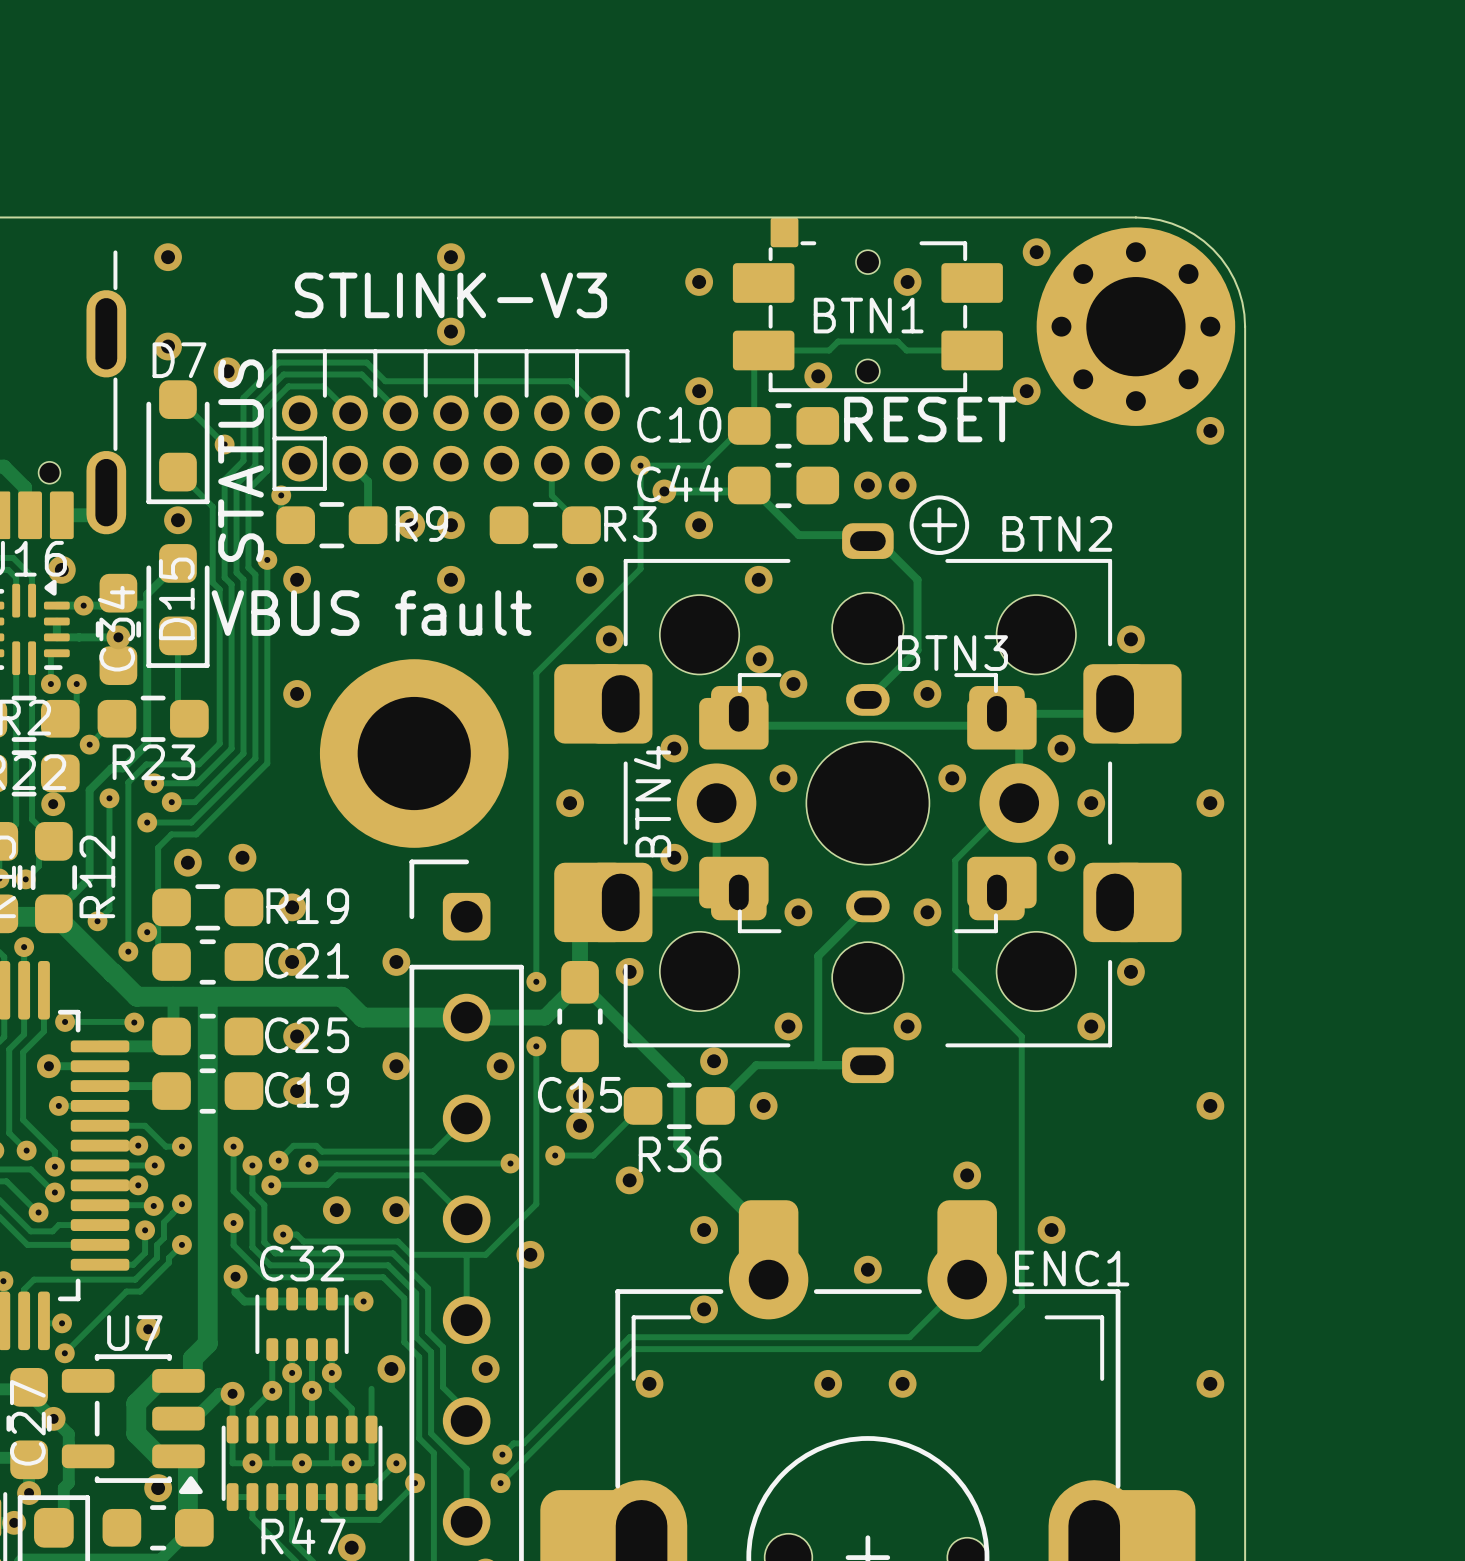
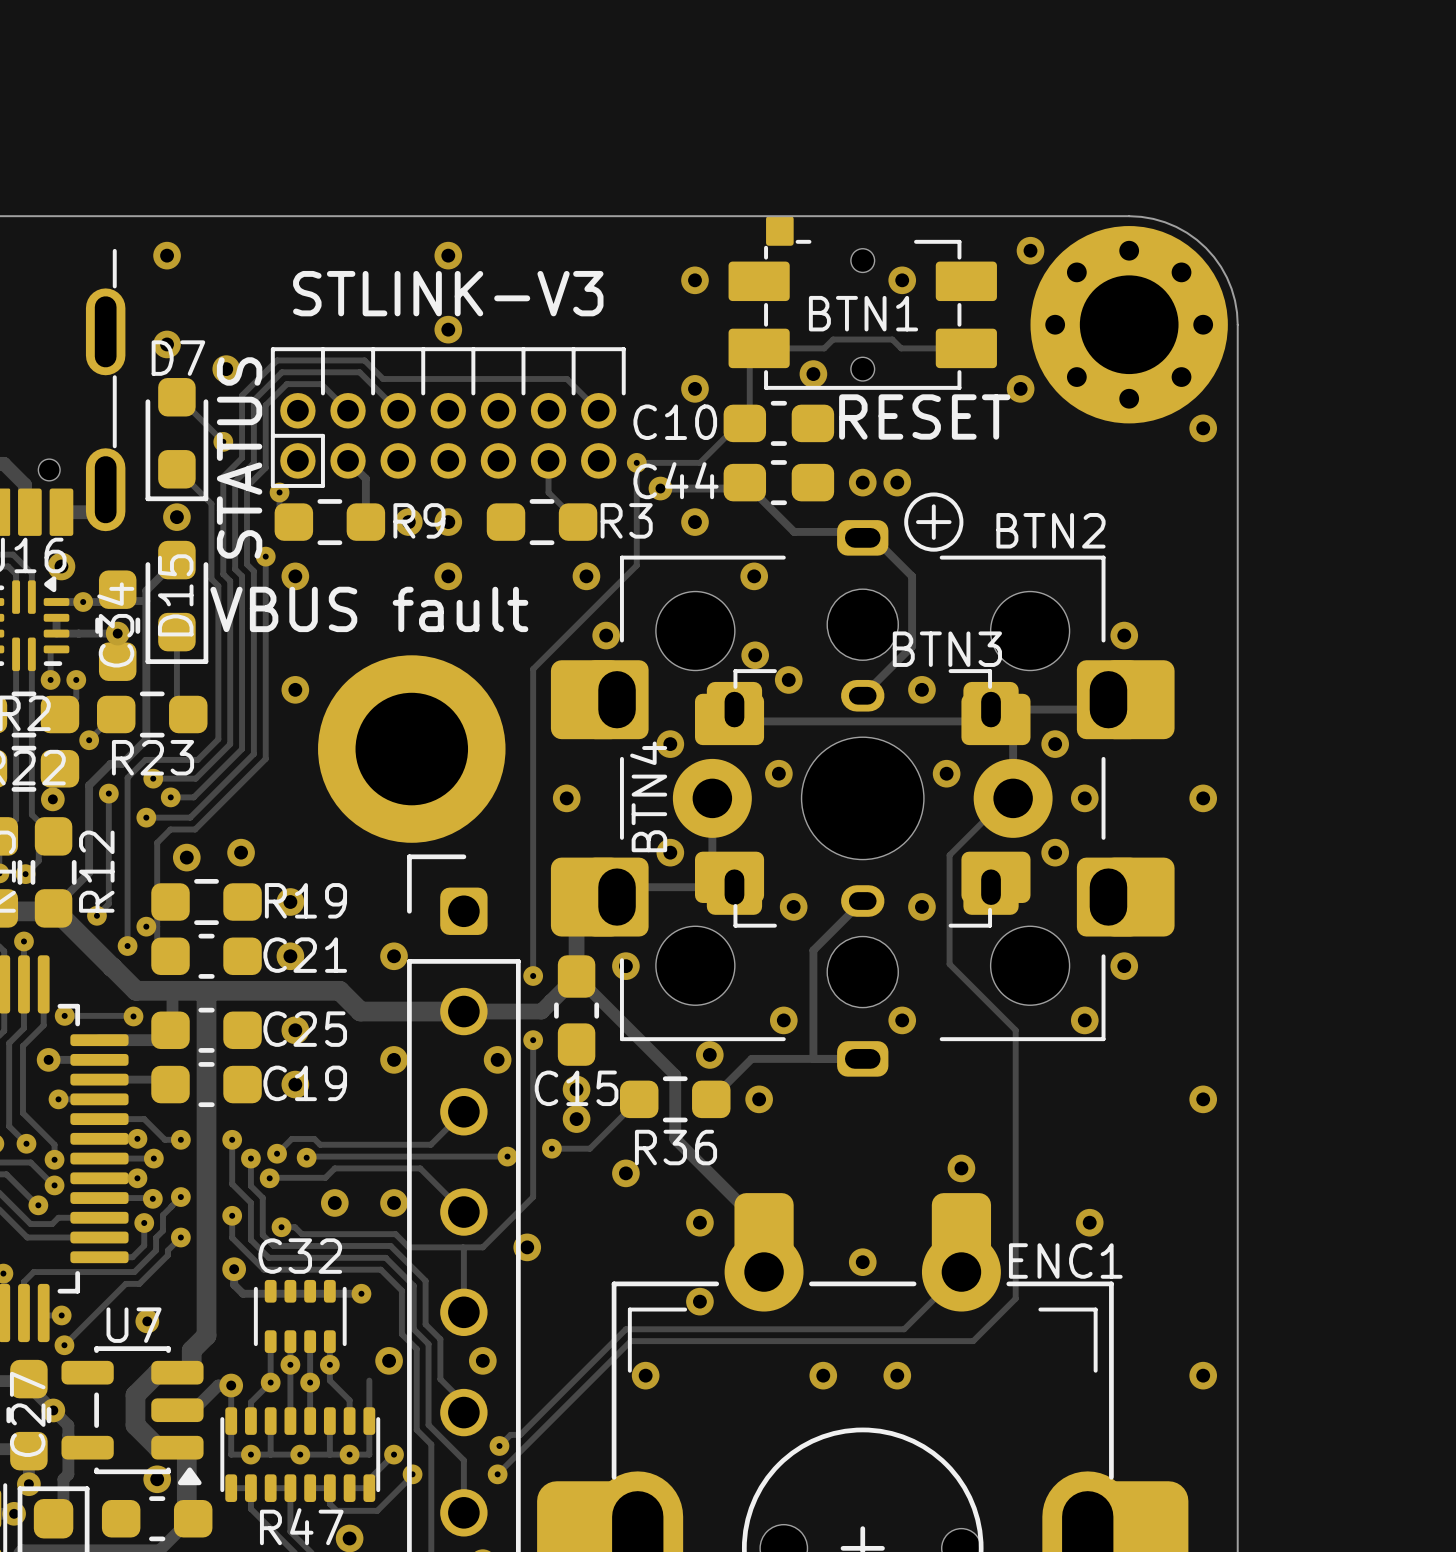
via position: (1051, 1230) -> (1089, 1222)

